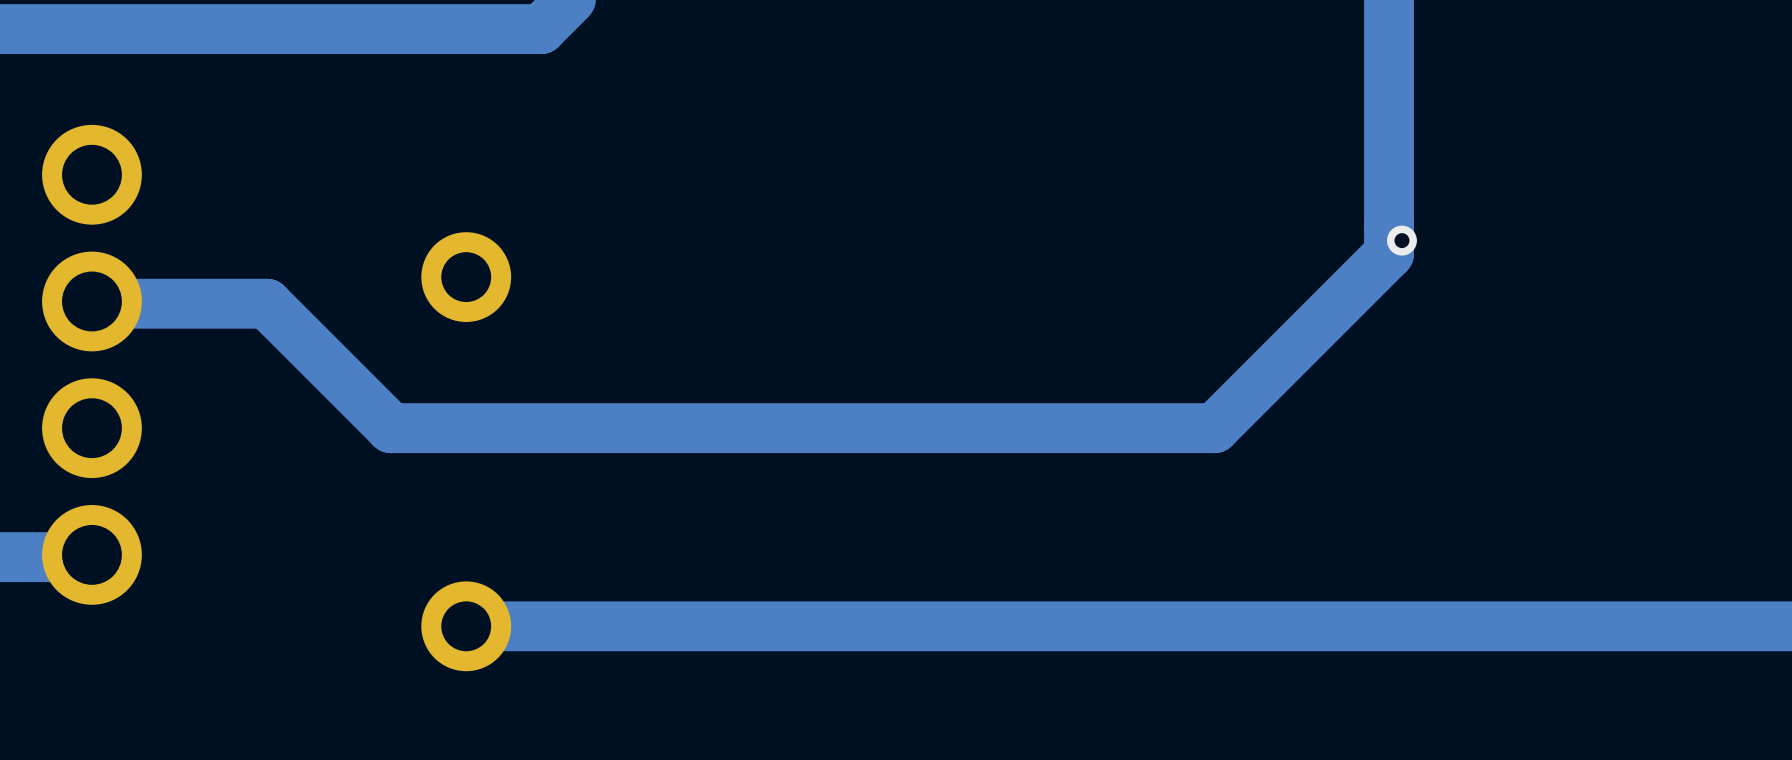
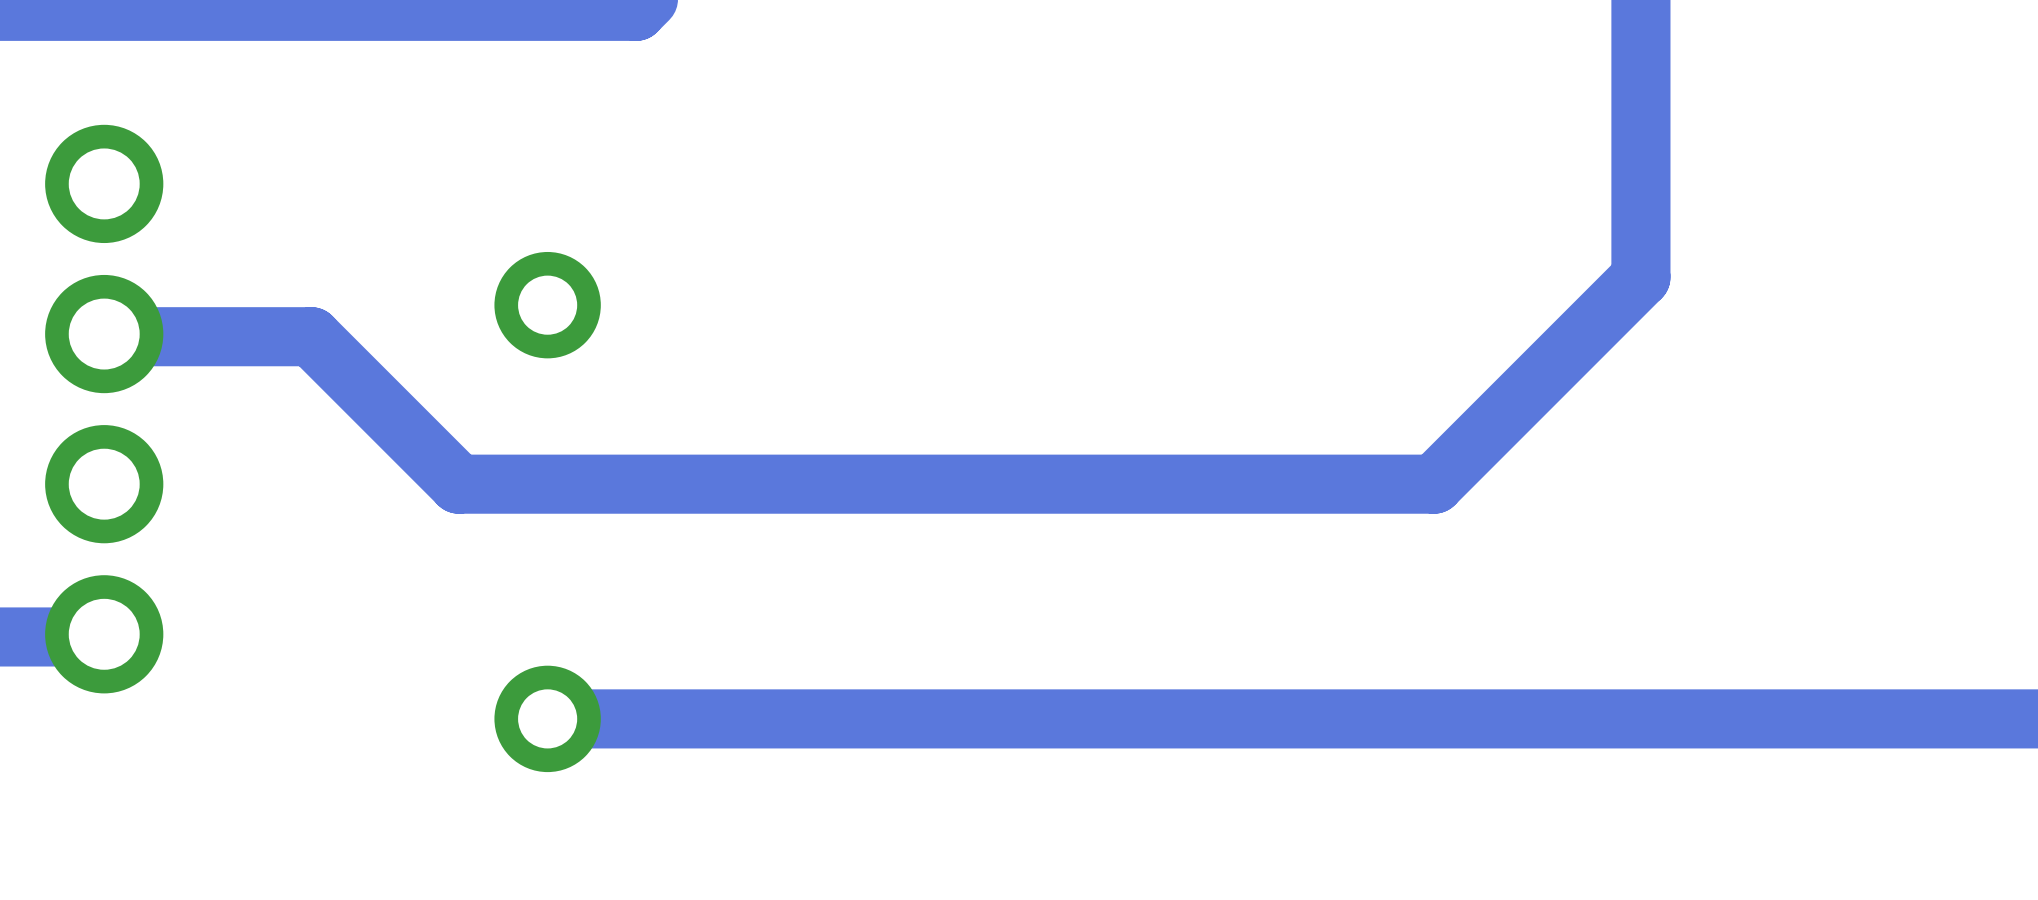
via: (1401, 240) -> none

